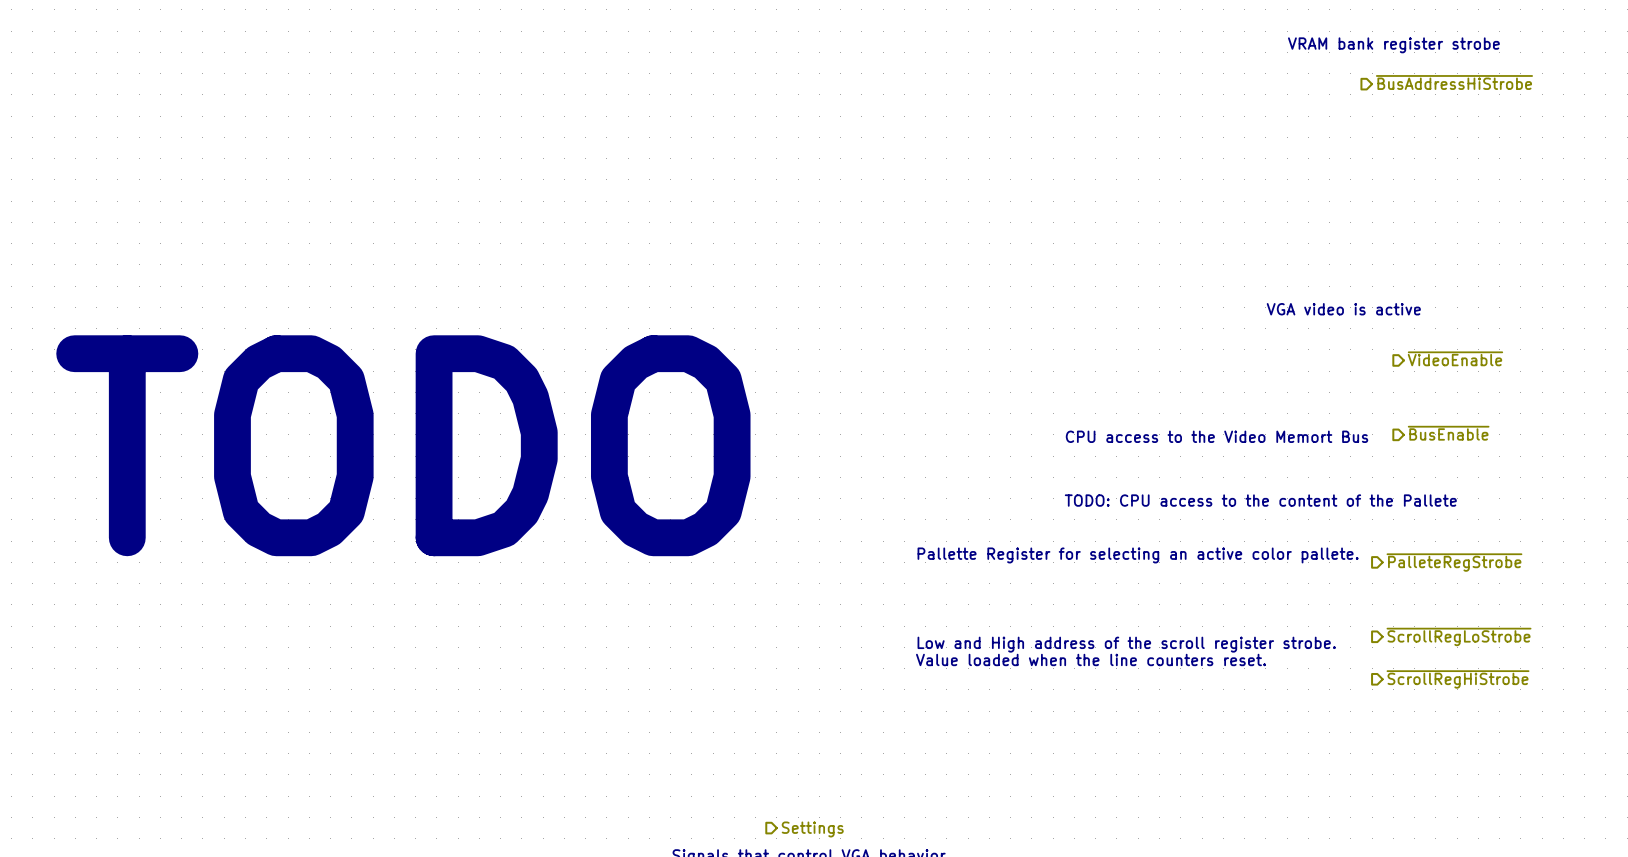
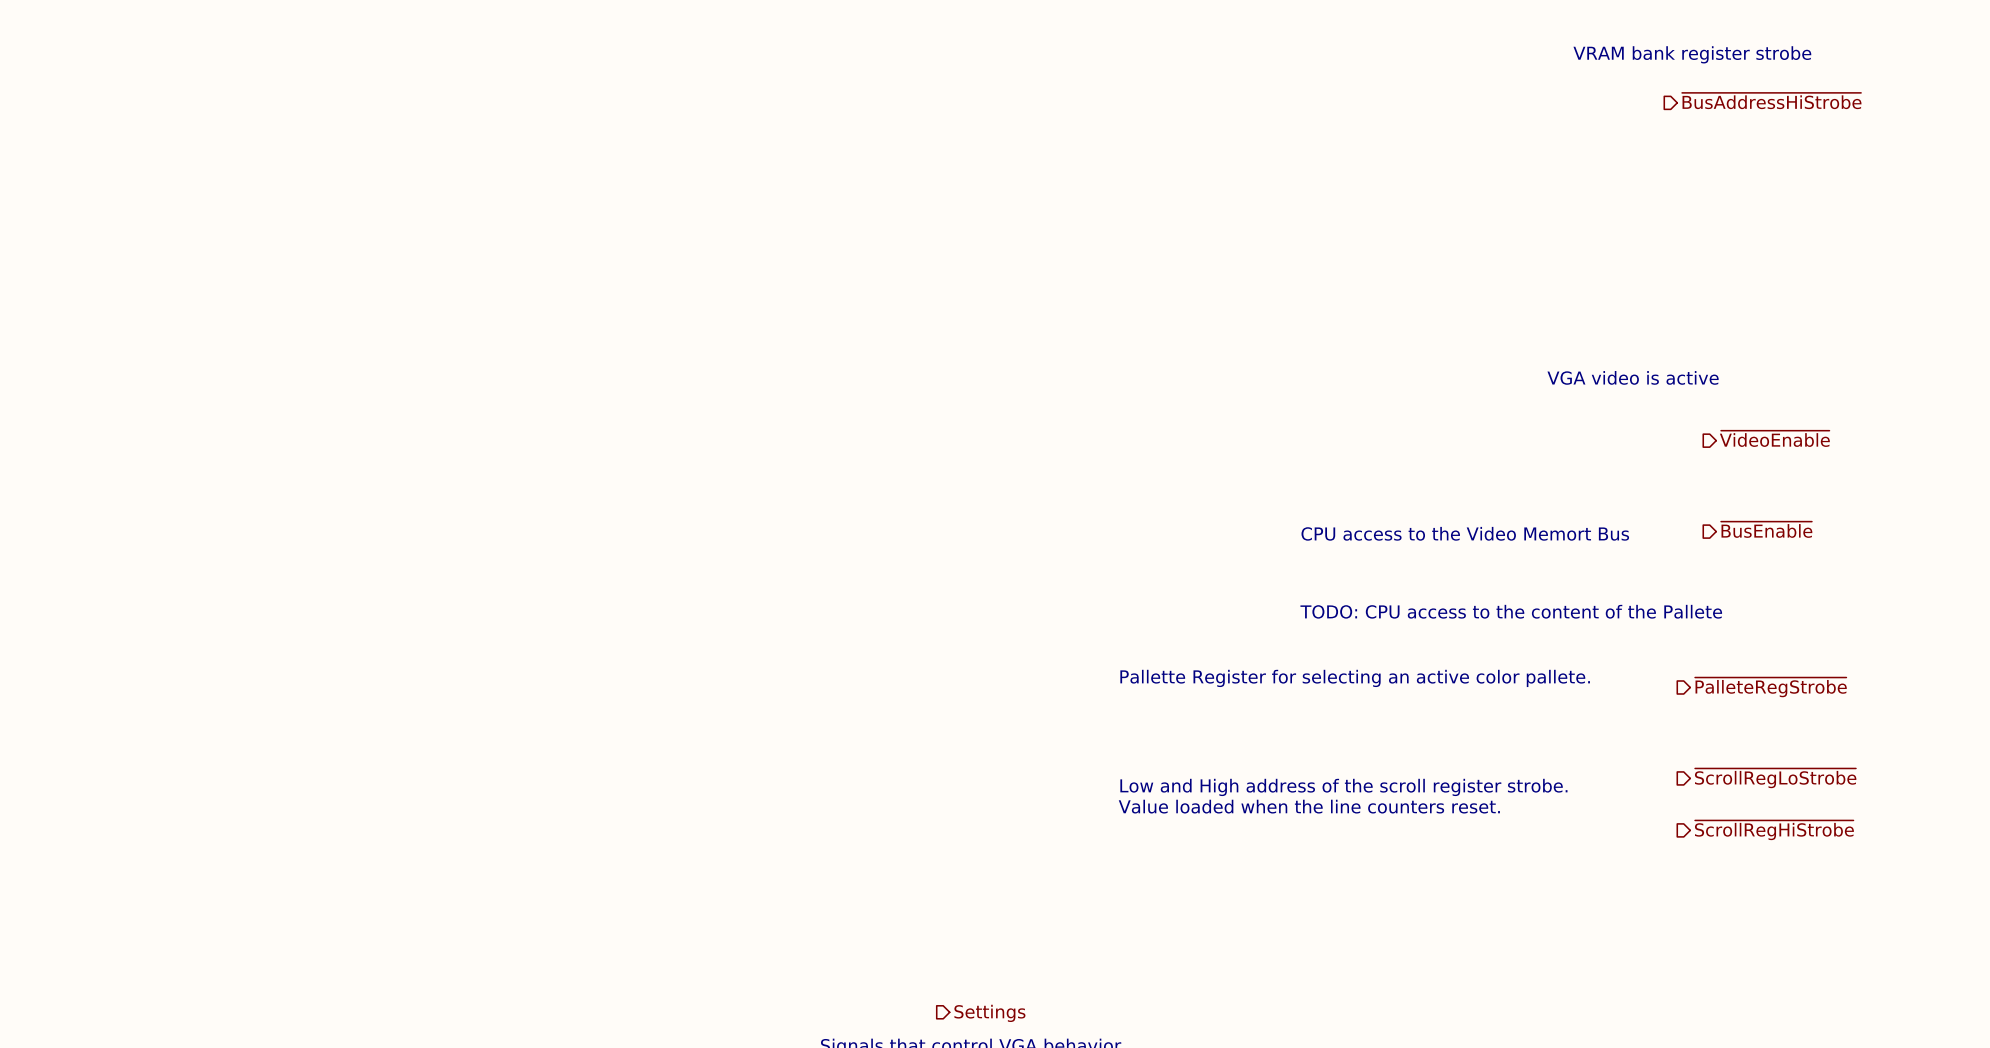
text: TODO (403, 445) -> none

